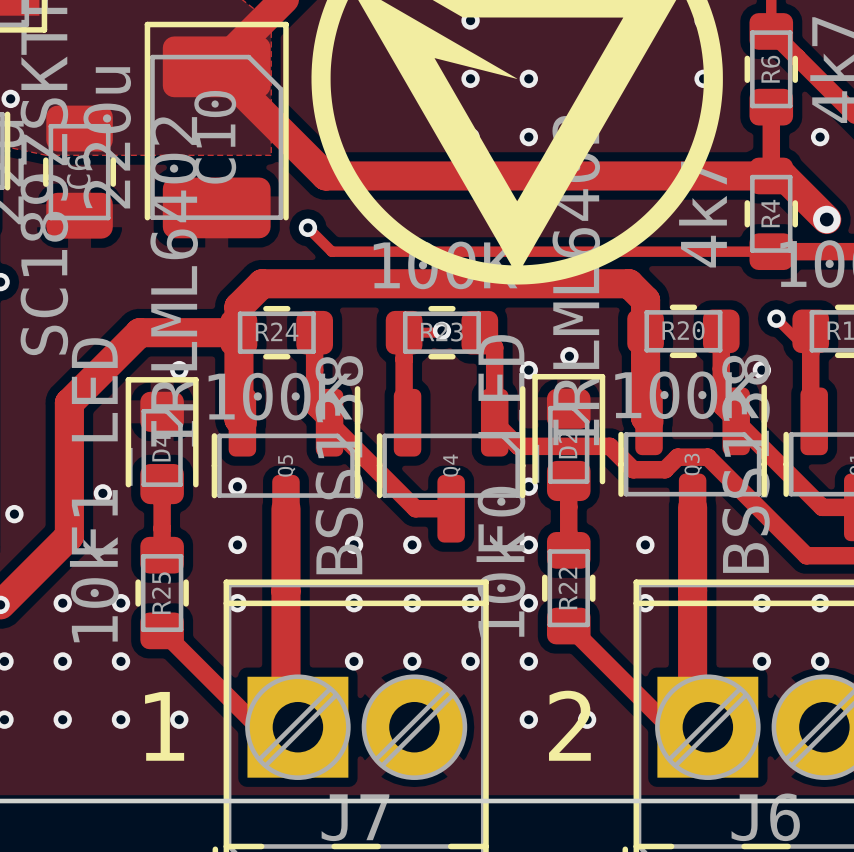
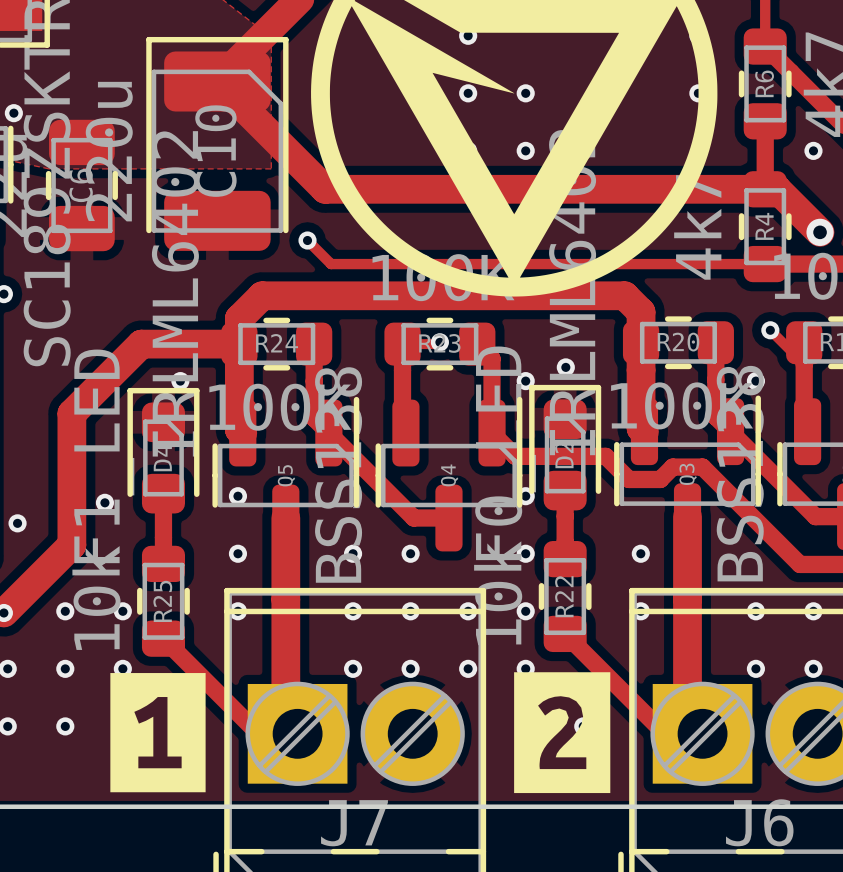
drawing: none -> [514, 672, 611, 794]
drawing: none -> [110, 673, 206, 793]
text: 2 (569, 725) -> none
text: 1 (164, 726) -> none

